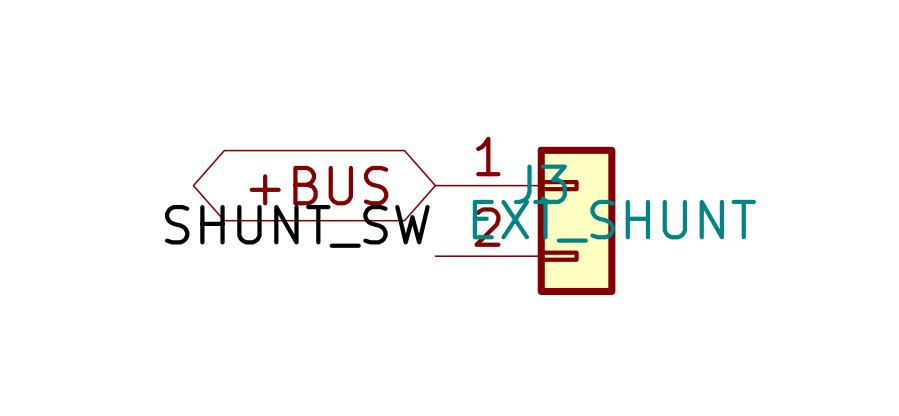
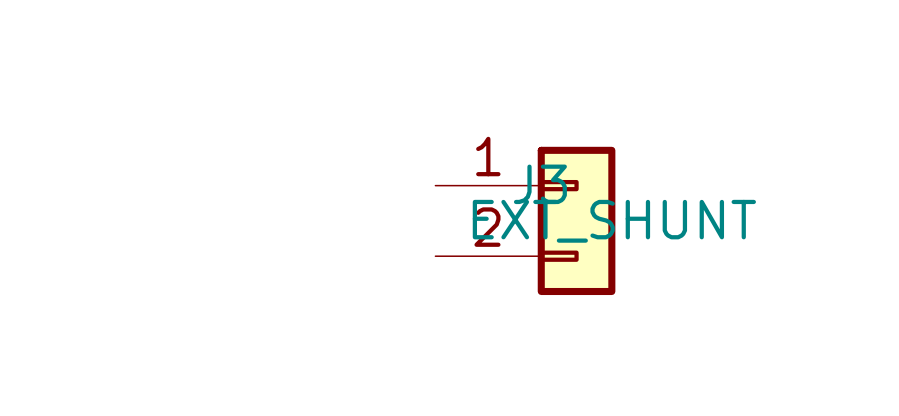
global label: +BUS (318, 185) -> none
label: SHUNT_SW (297, 226) -> none

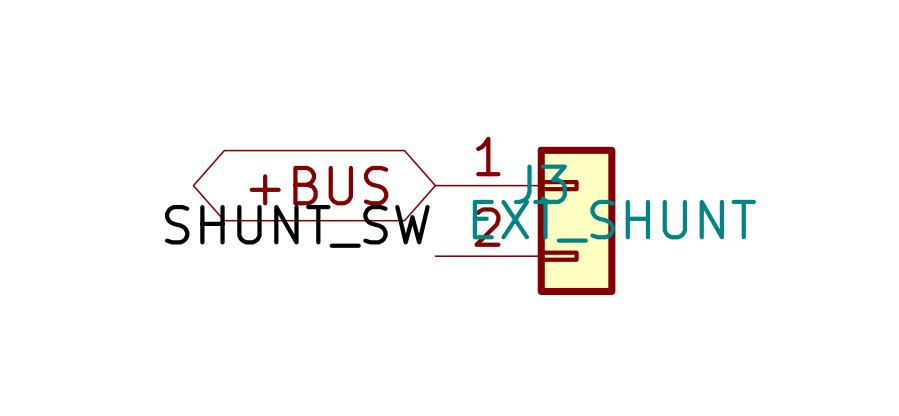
global label: none -> +BUS (318, 185)
label: none -> SHUNT_SW (297, 226)

